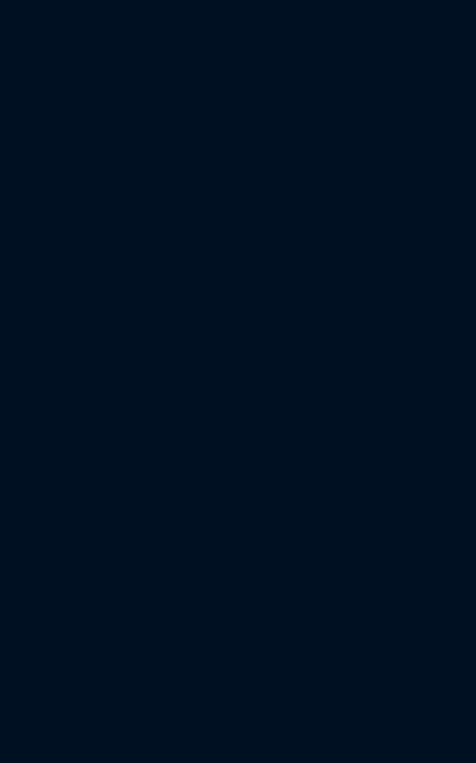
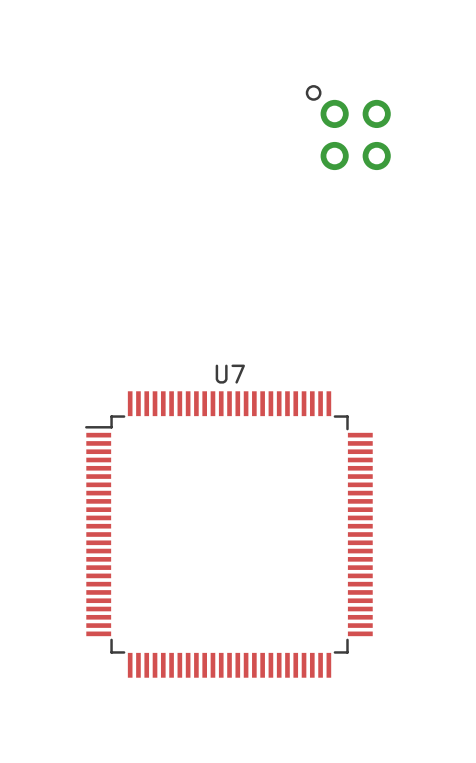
part: none -> (348, 127)
U7: none -> (228, 534)

